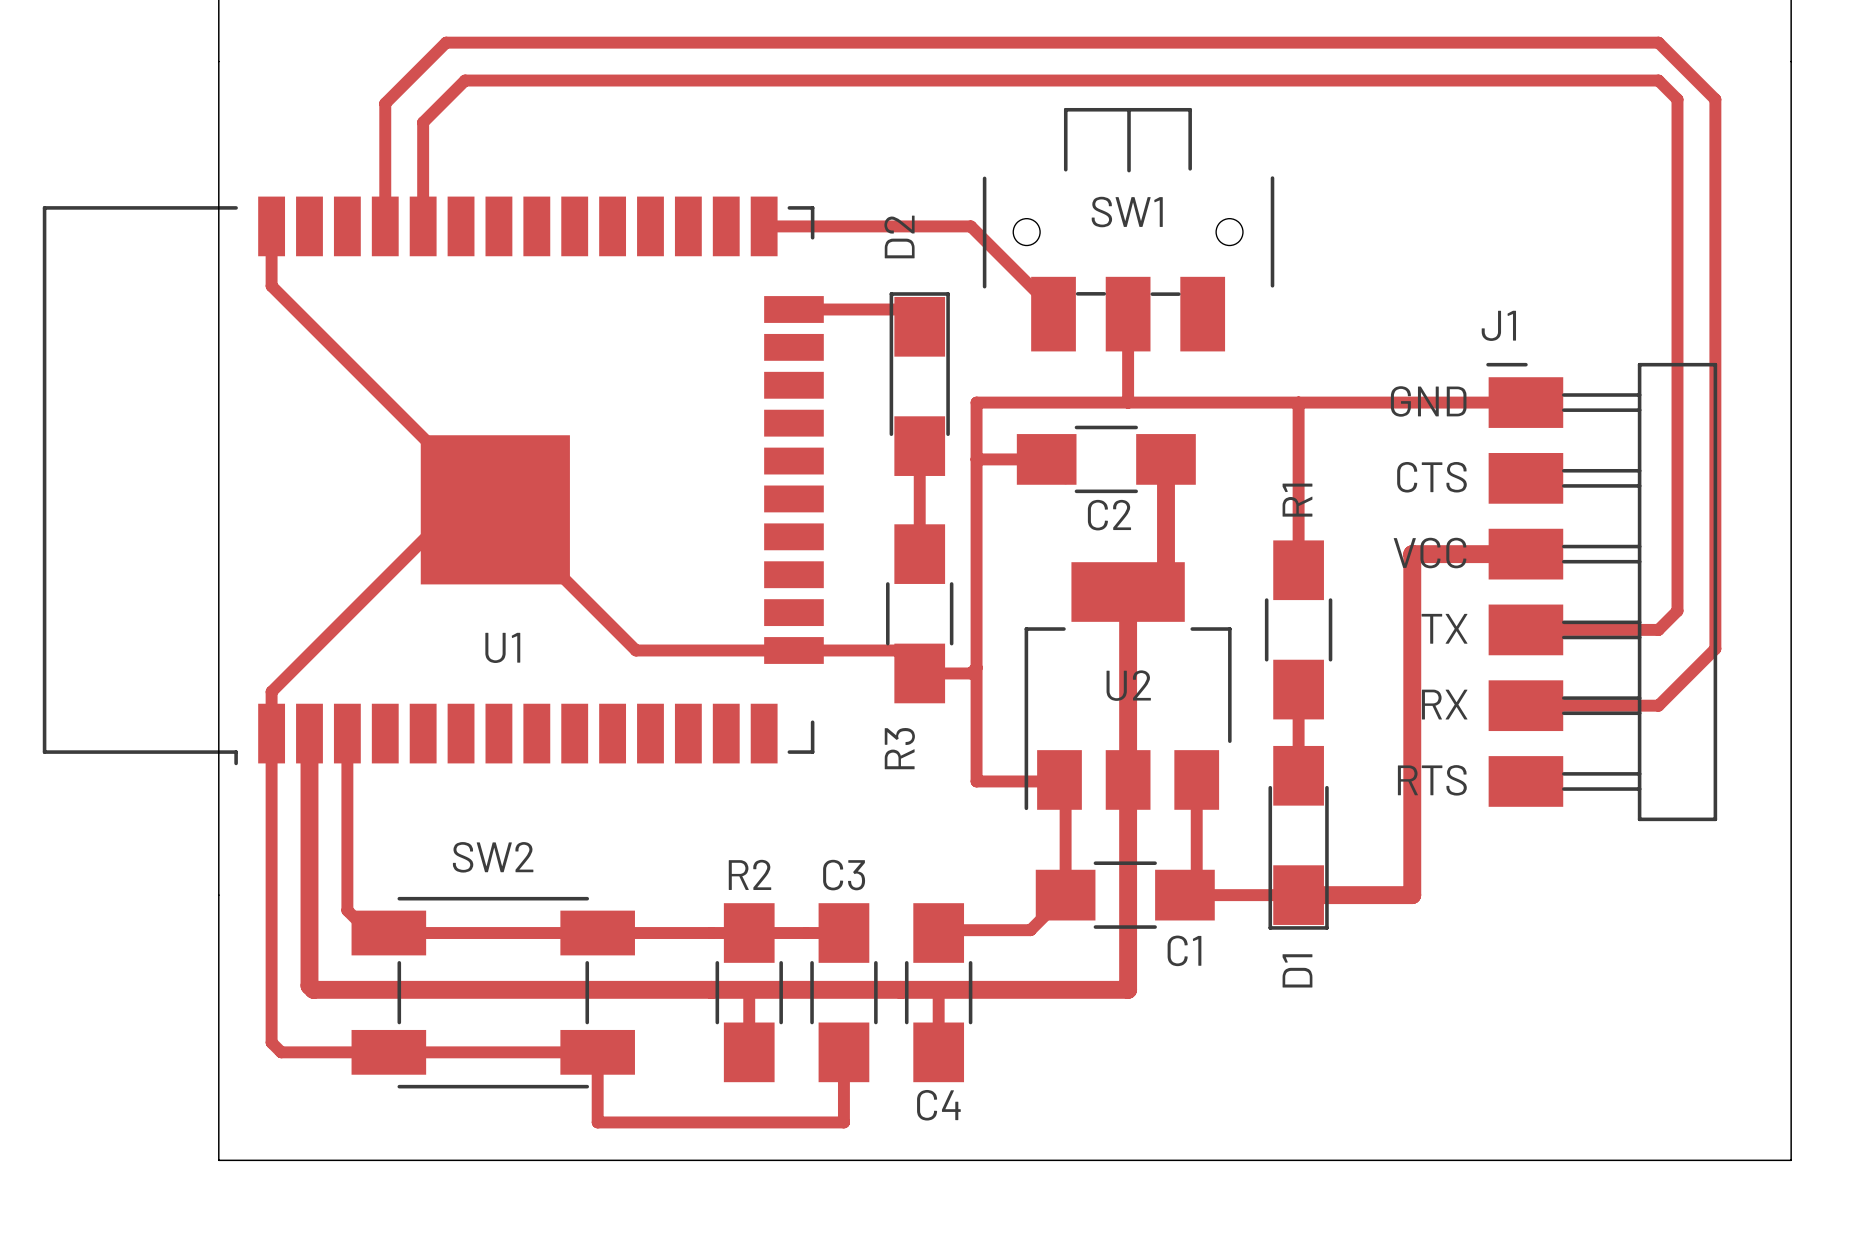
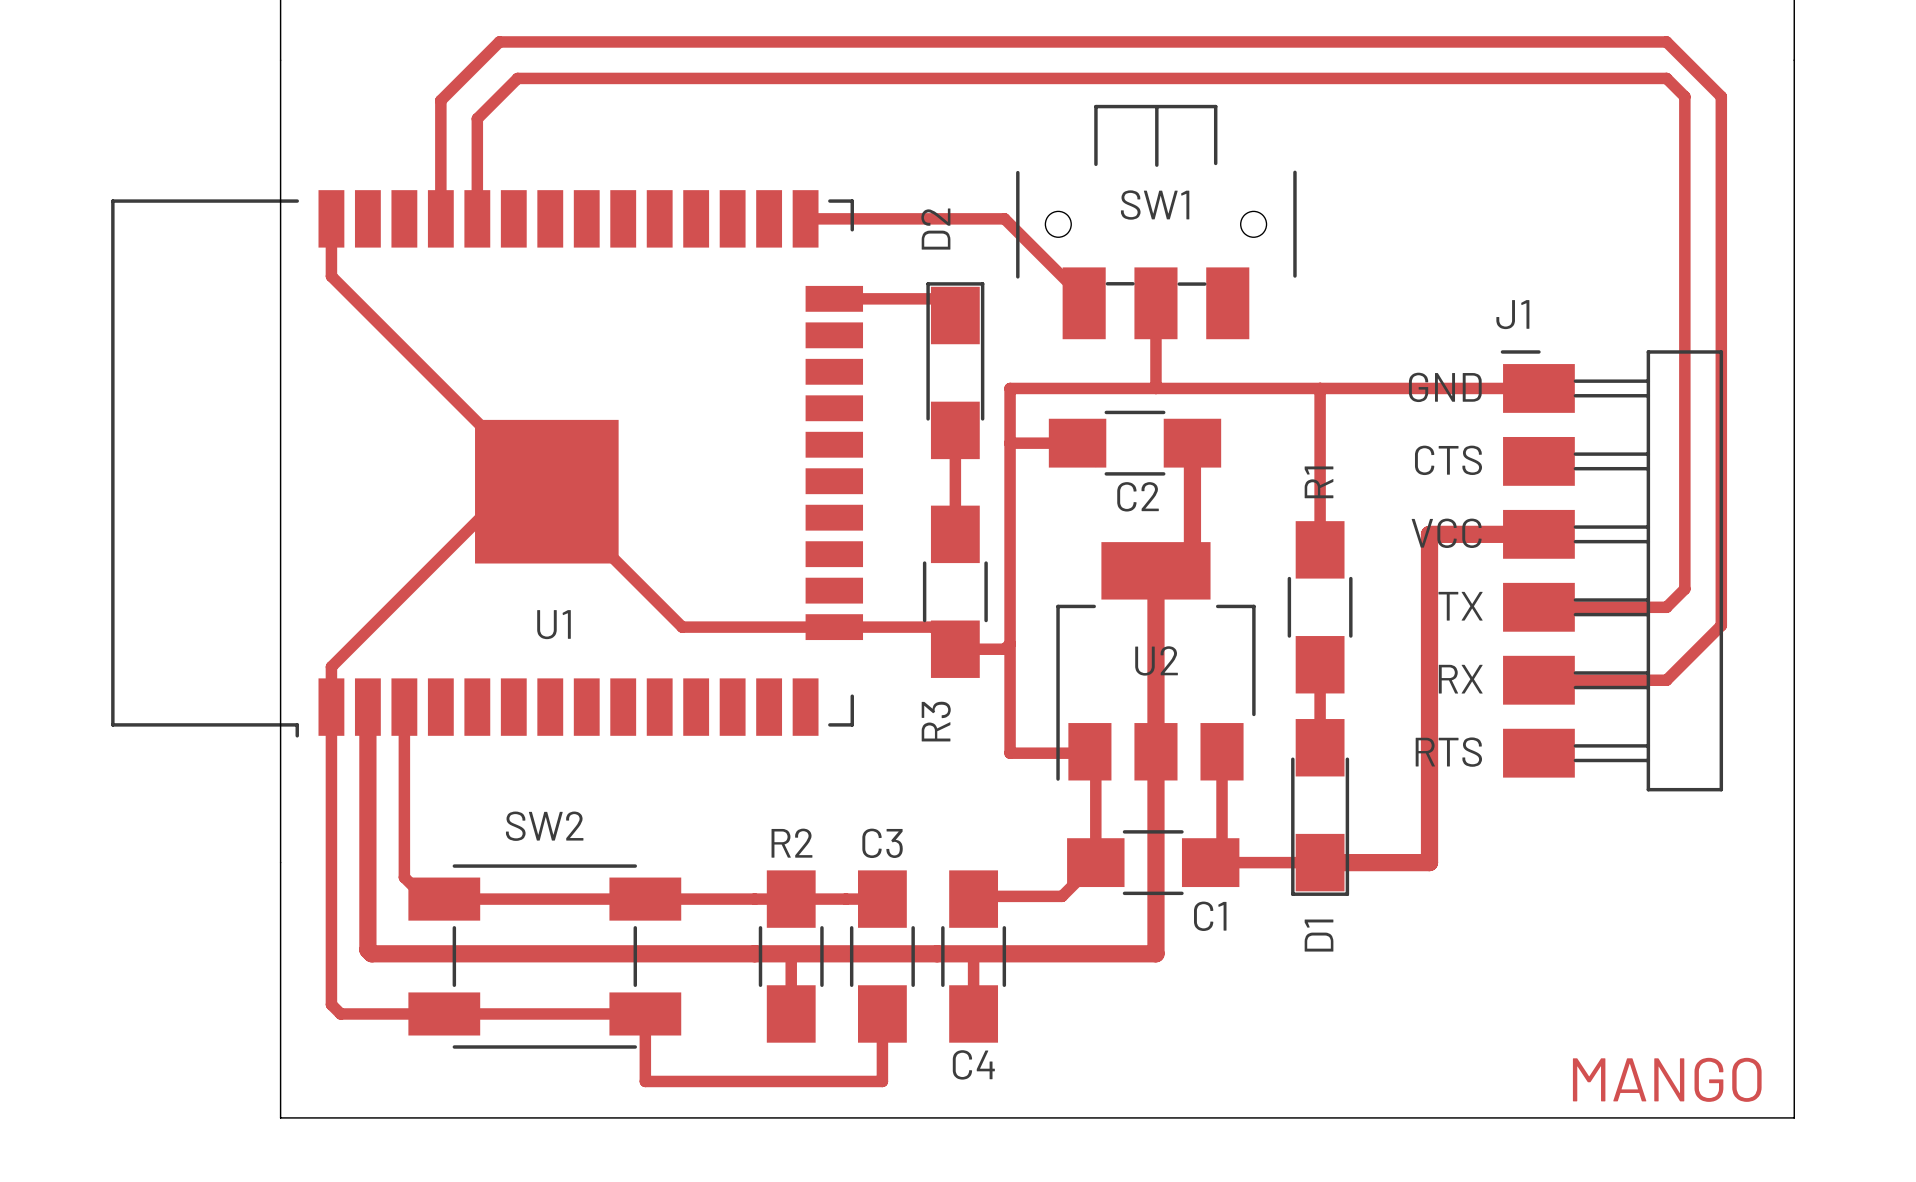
text: none -> MANGO (1667, 1079)

